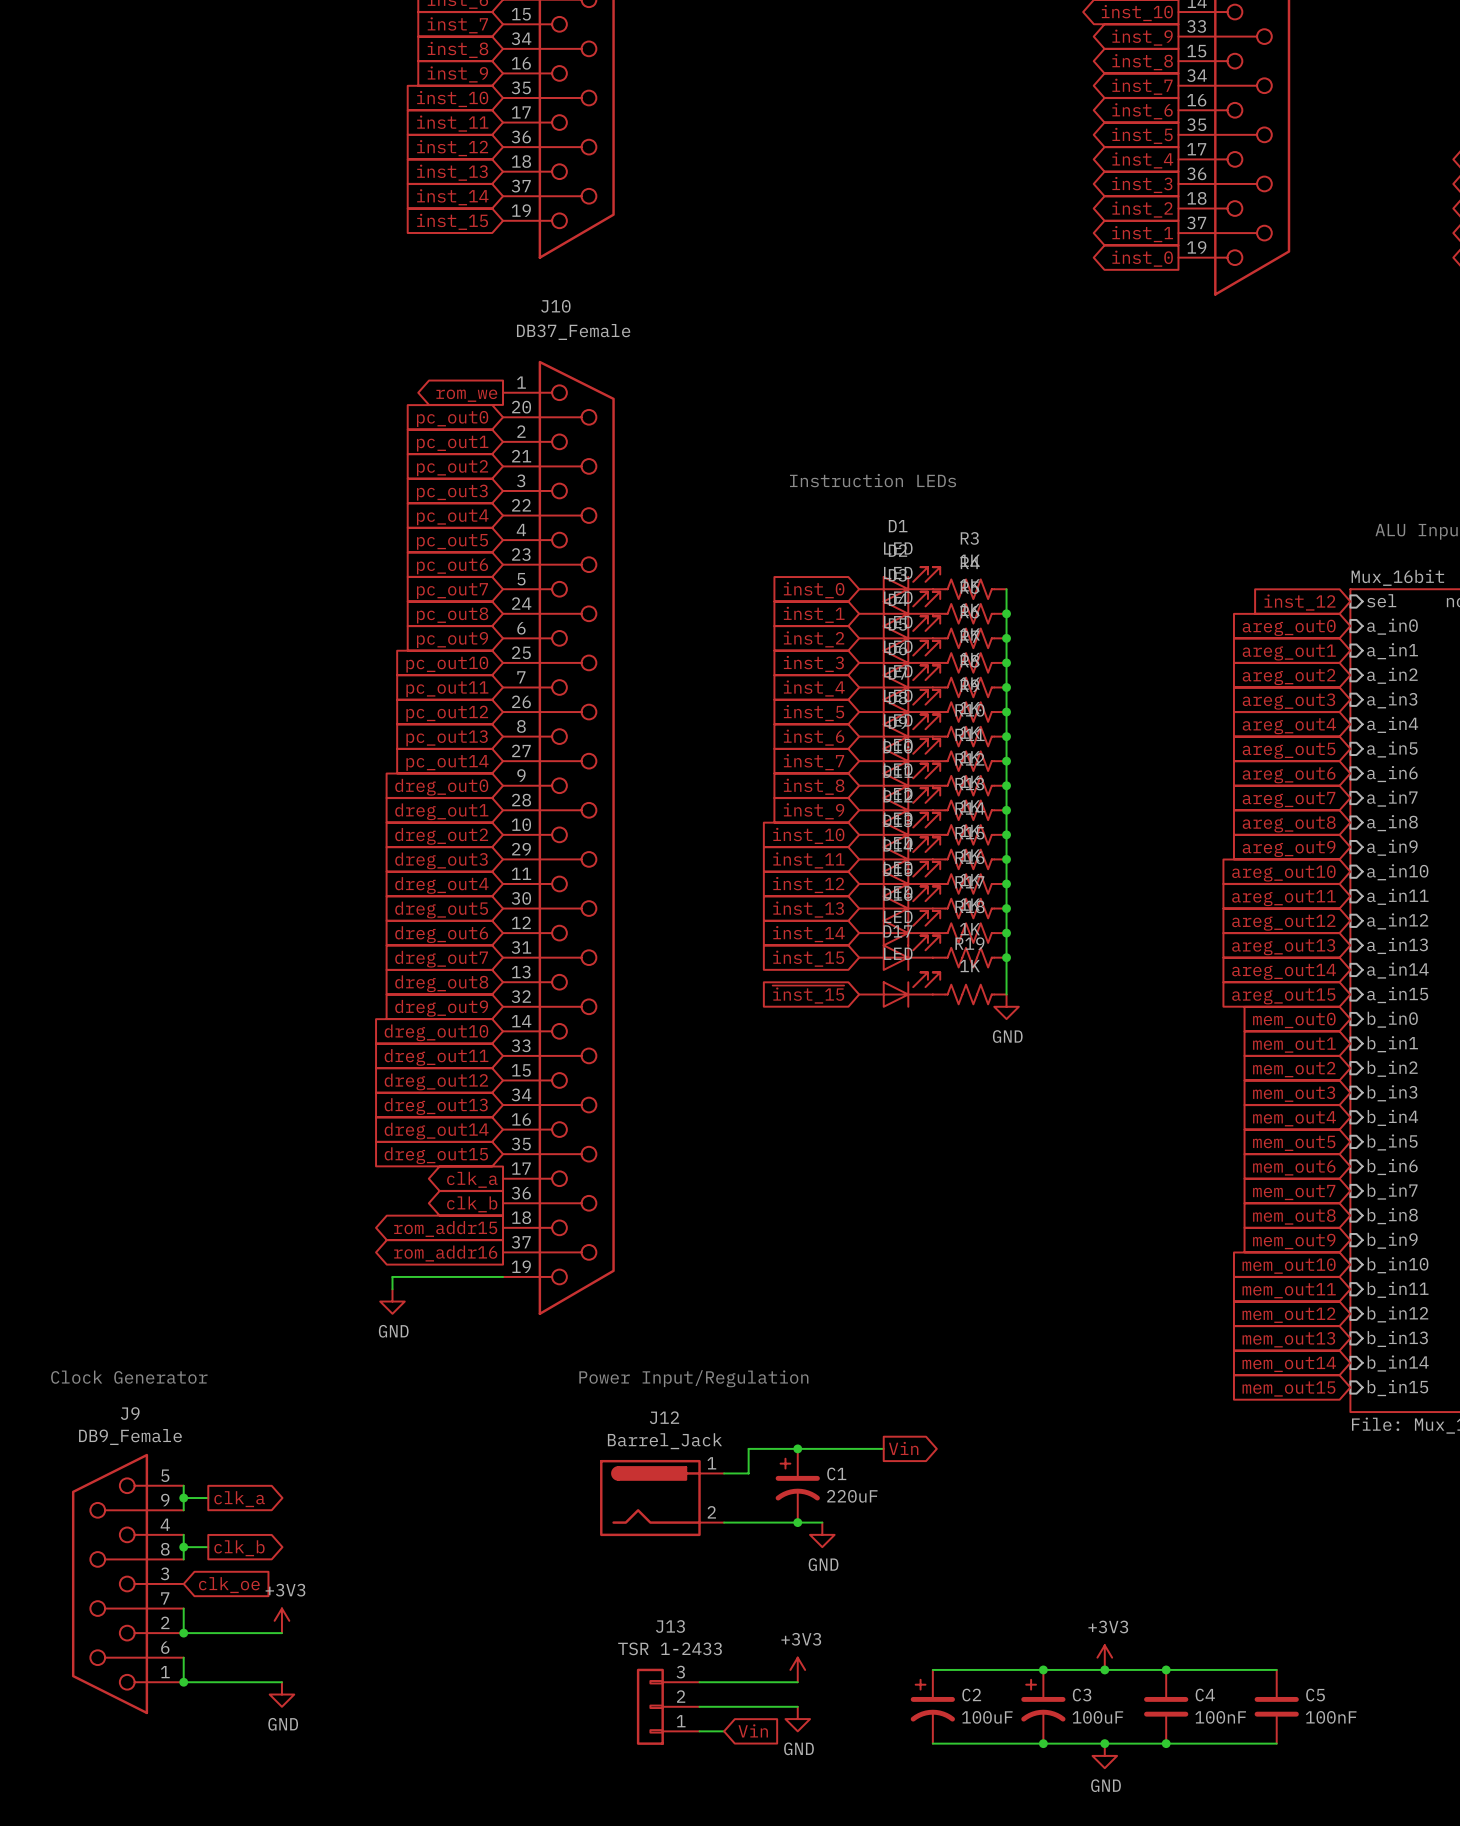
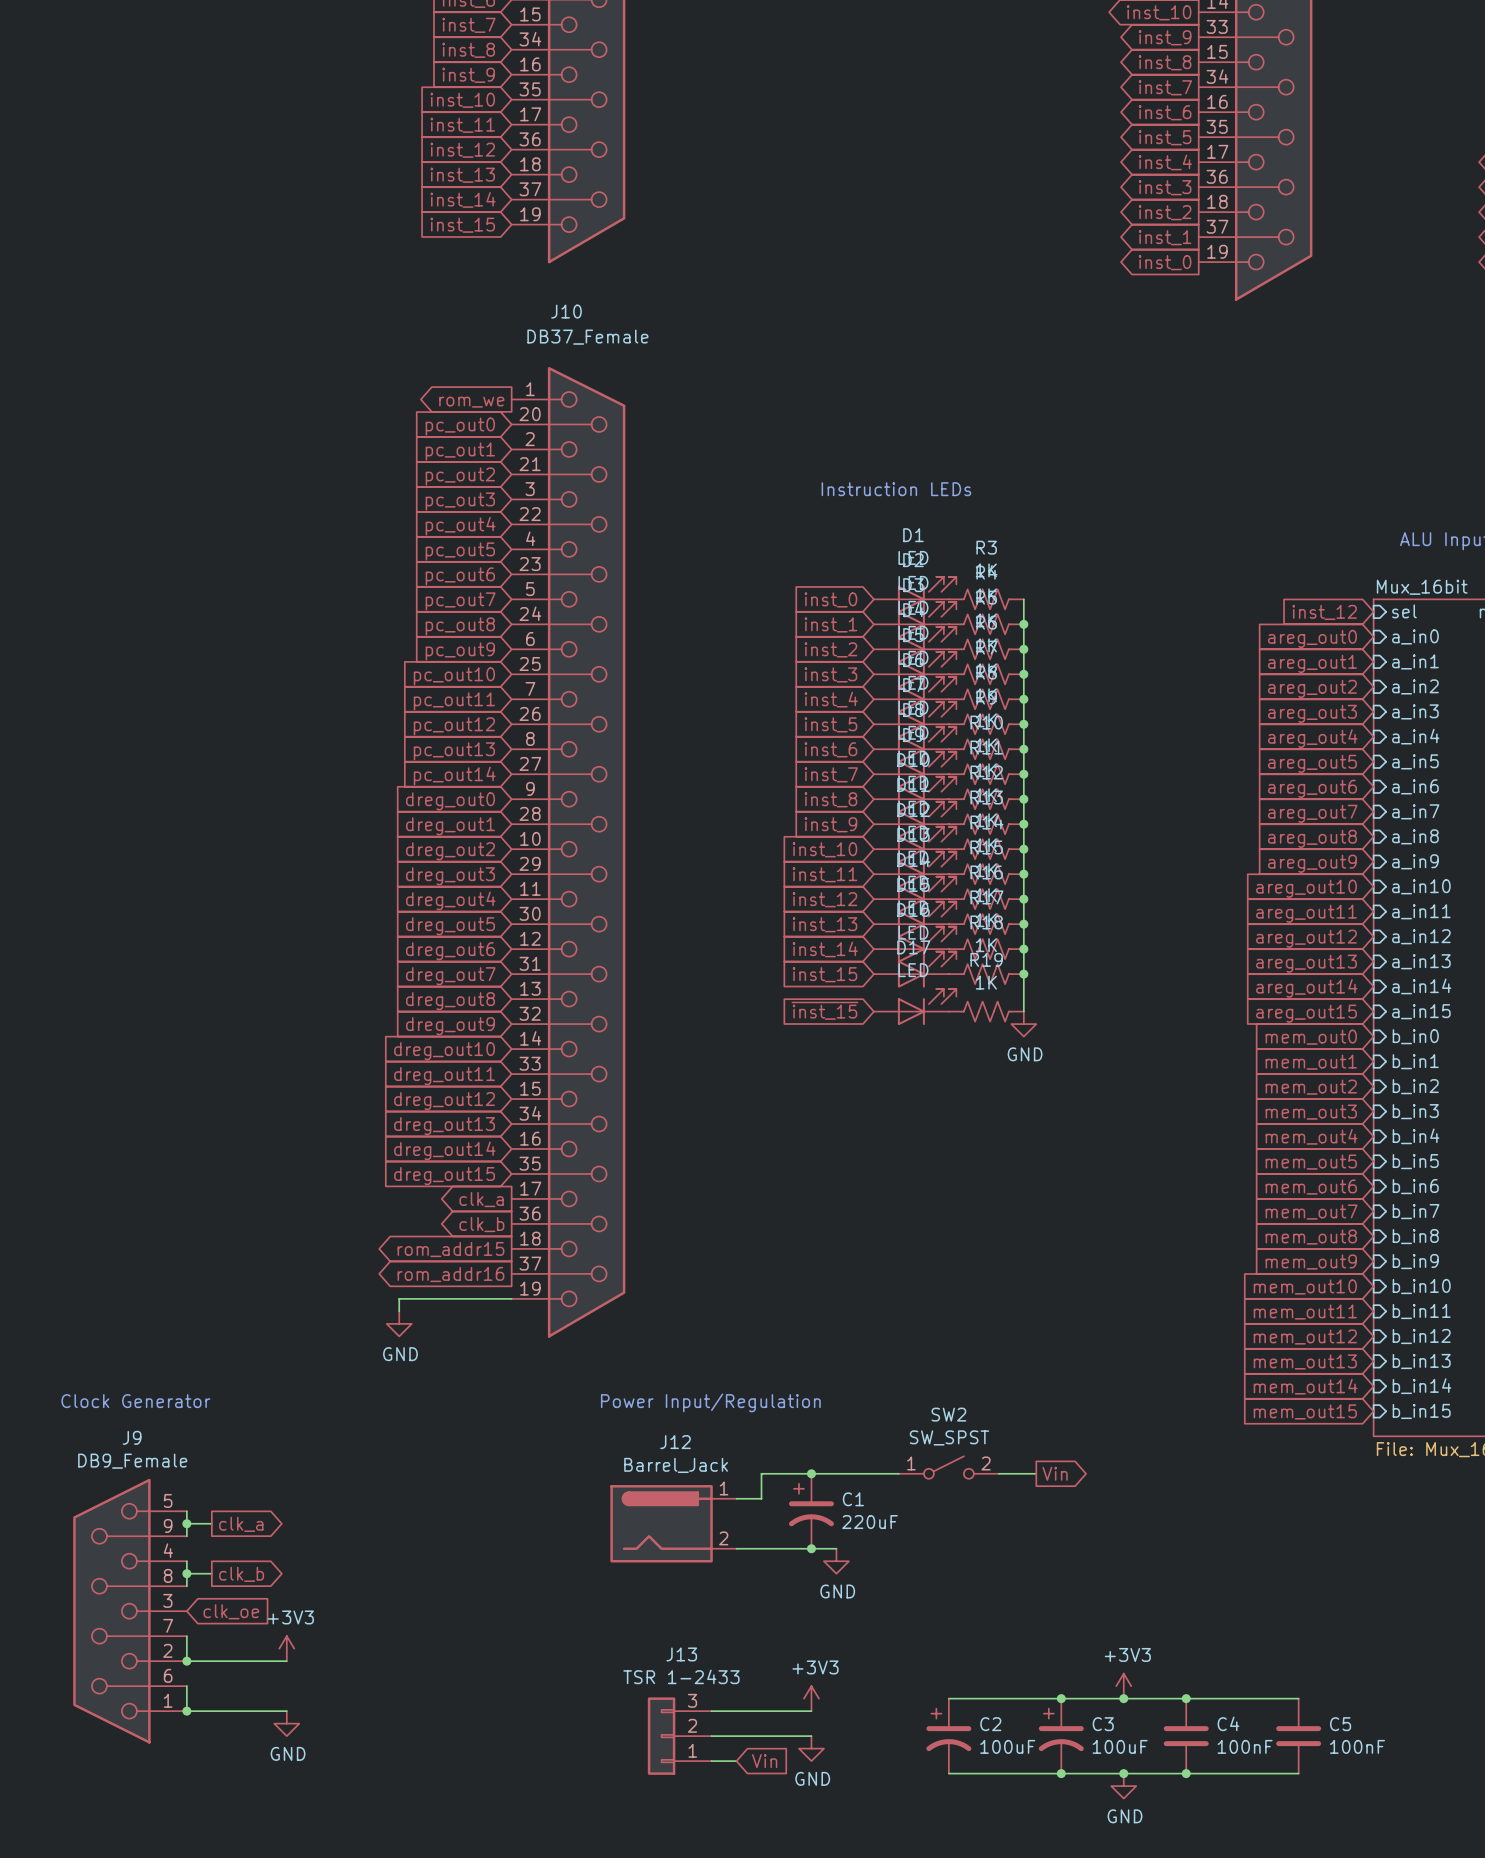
SW2: none -> SW_SPST (948, 1467)
global label position: Vin (903, 1448) -> Vin (1055, 1473)
wire: none -> (998, 1473) (1036, 1473)

